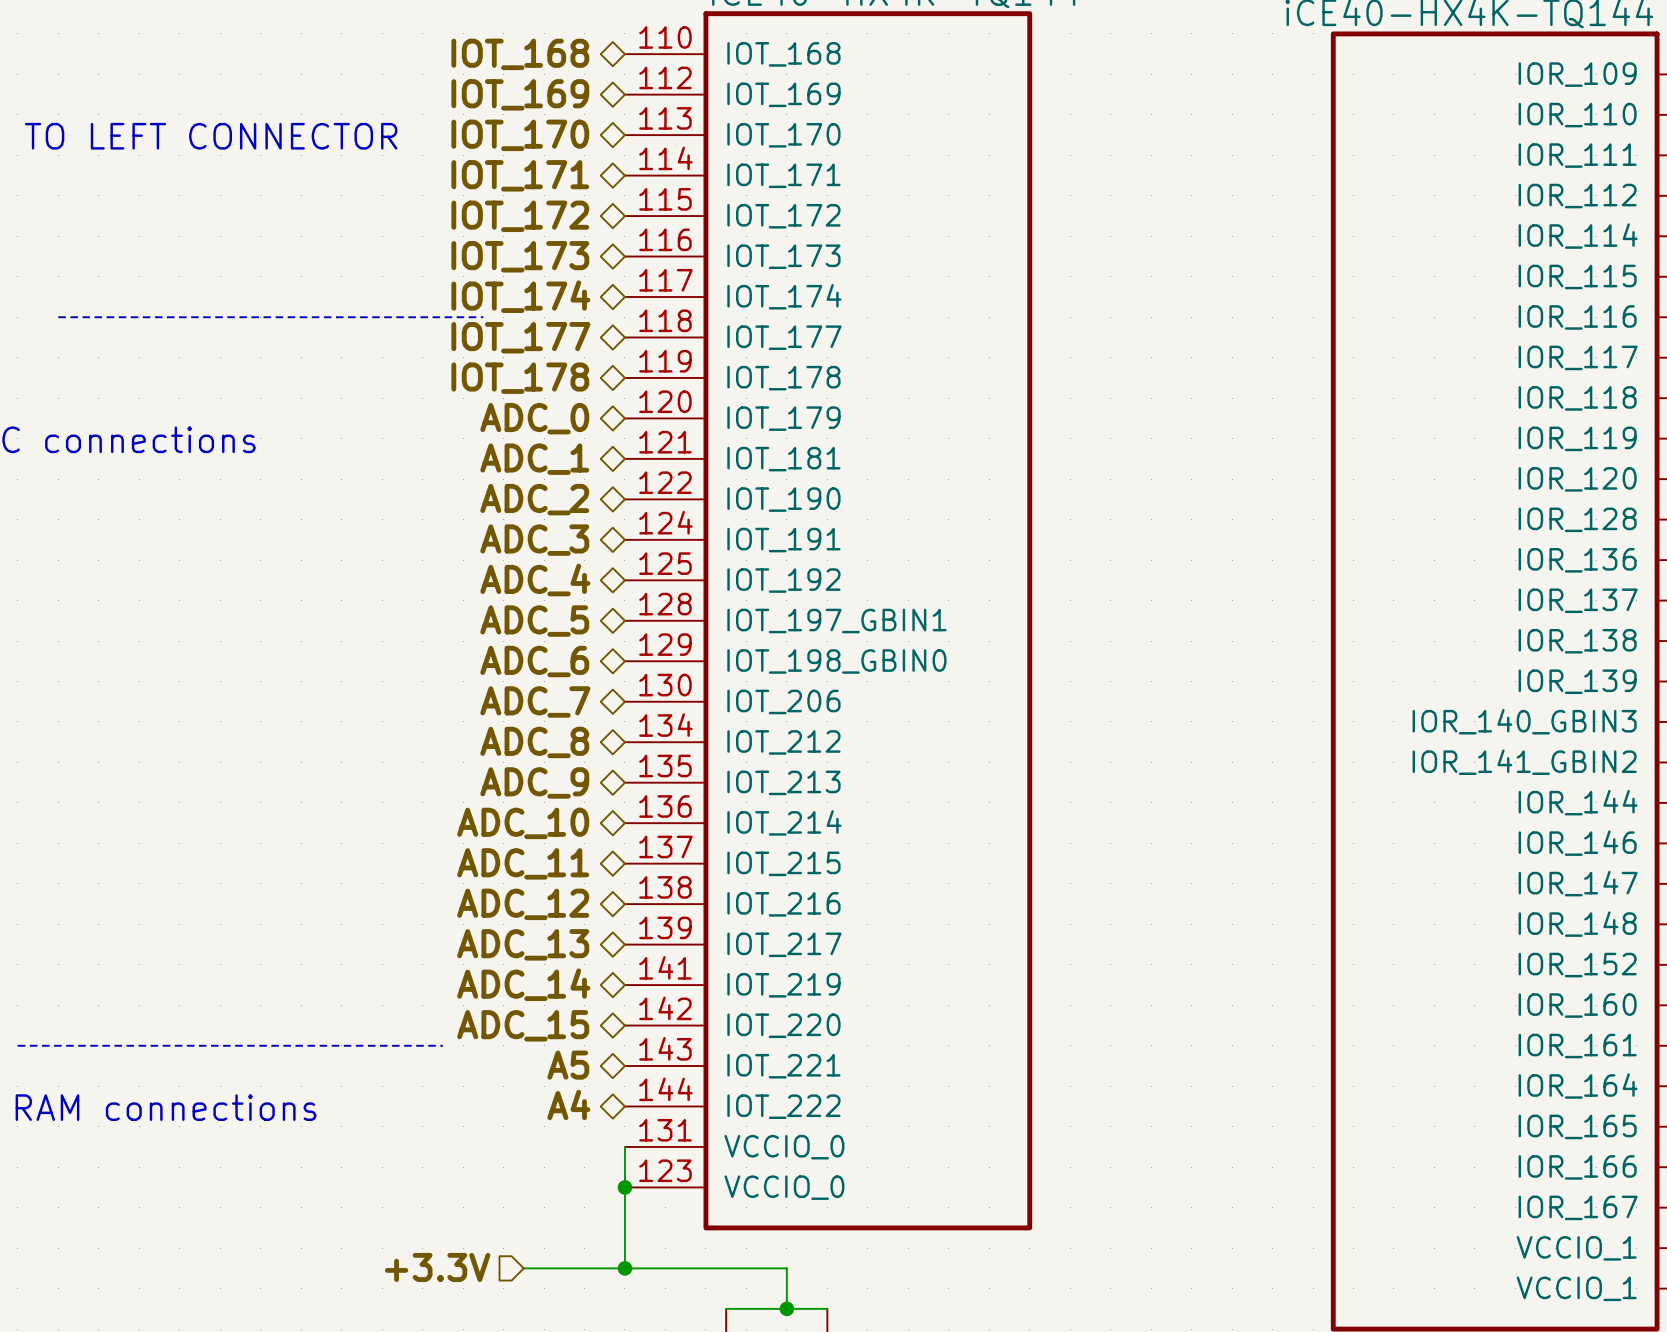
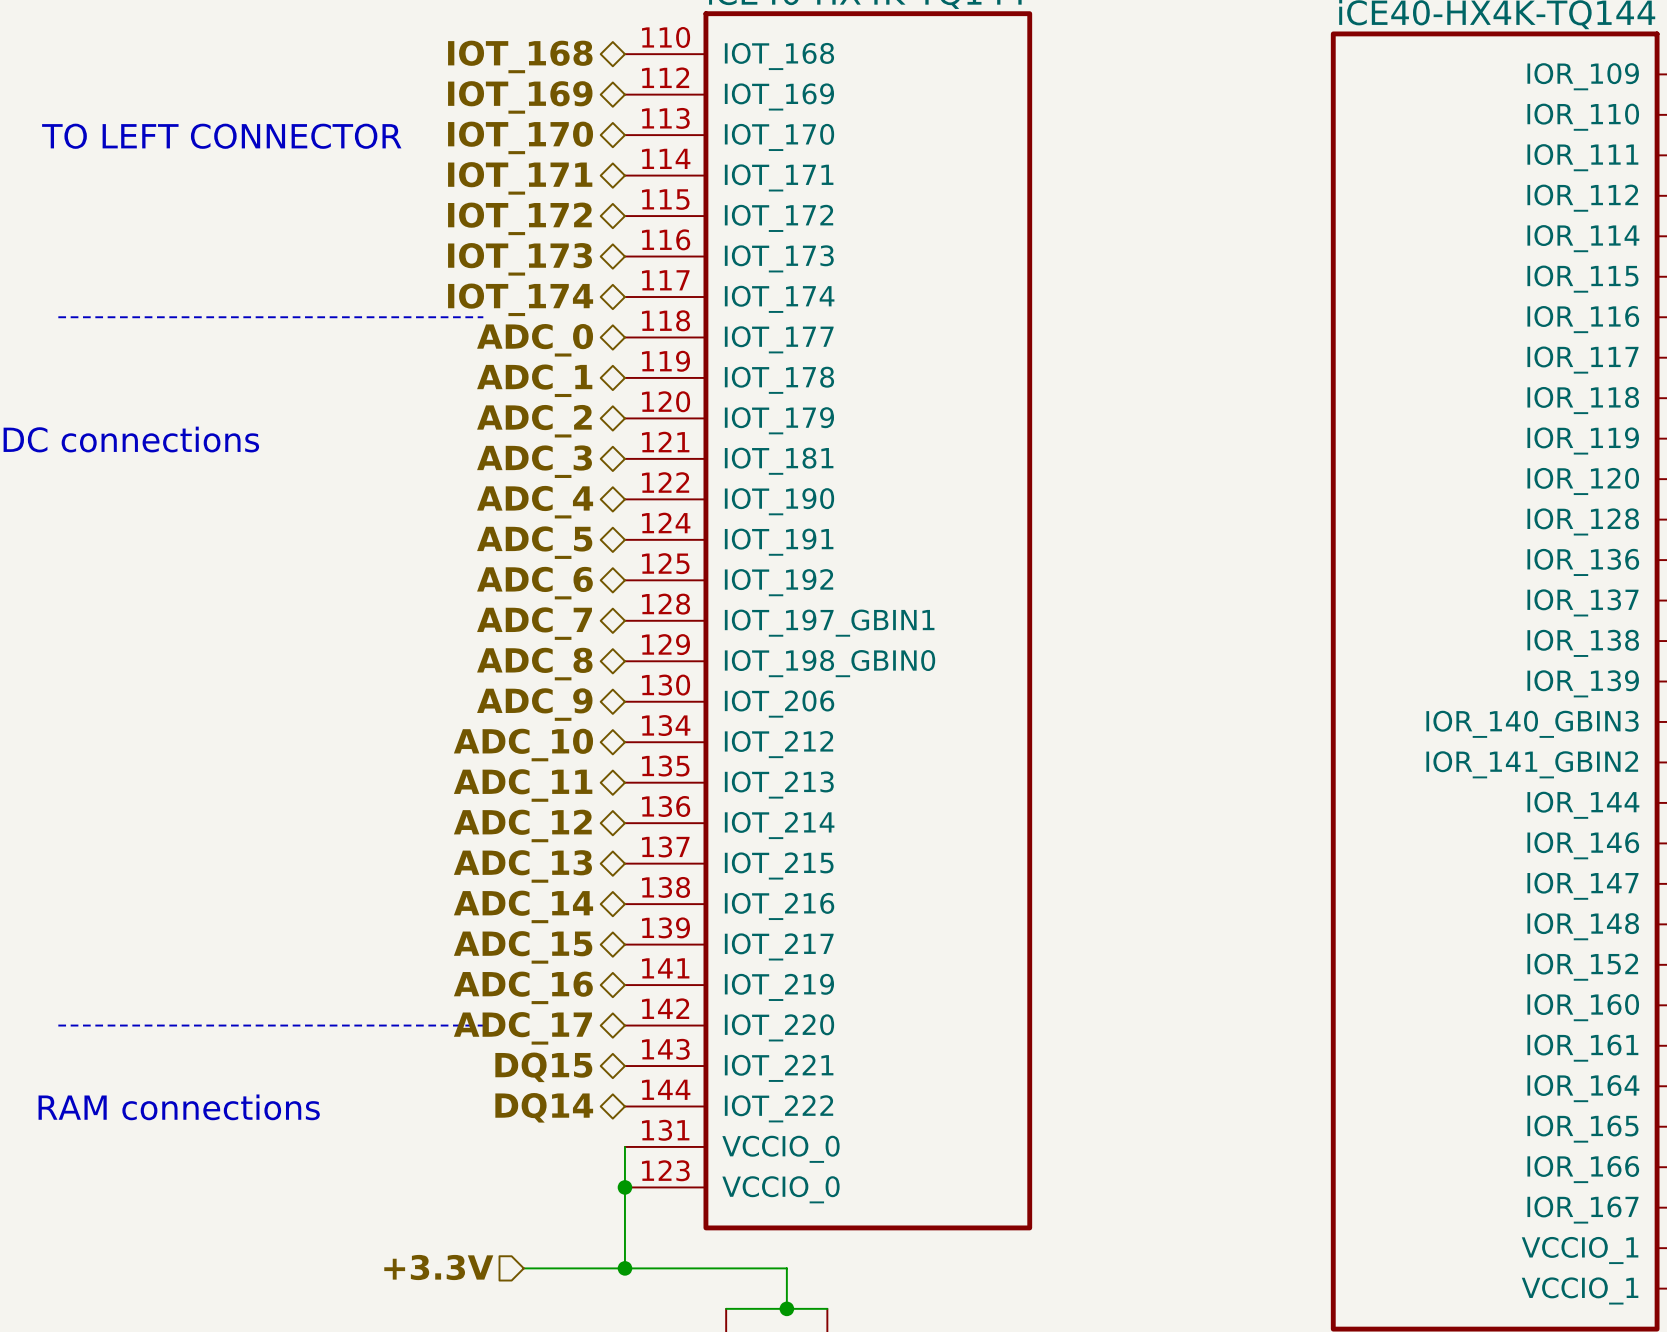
hierarchical label: IOT_177 (520, 337) -> ADC_0 (535, 340)
hierarchical label: IOT_178 (520, 378) -> ADC_1 (534, 380)
hierarchical label: ADC_0 (534, 418) -> ADC_2 (534, 421)
hierarchical label: ADC_1 (534, 459) -> ADC_3 (534, 461)
hierarchical label: ADC_2 (534, 499) -> ADC_4 (535, 502)
hierarchical label: ADC_3 (534, 540) -> ADC_5 (534, 542)
hierarchical label: ADC_4 (535, 579) -> ADC_6 (534, 583)
hierarchical label: ADC_5 (534, 621) -> ADC_7 (534, 623)
hierarchical label: ADC_6 (534, 661) -> ADC_8 (534, 664)
hierarchical label: ADC_7 (535, 701) -> ADC_9 (534, 704)
hierarchical label: ADC_8 (534, 742) -> ADC_10 (523, 745)
hierarchical label: ADC_9 (534, 782) -> ADC_11 (523, 785)
hierarchical label: ADC_10 (523, 823) -> ADC_12 (522, 825)
hierarchical label: ADC_11 (523, 863) -> ADC_13 (522, 866)
hierarchical label: ADC_12 (523, 904) -> ADC_14 (523, 906)
hierarchical label: ADC_13 (523, 944) -> ADC_15 (523, 947)
hierarchical label: ADC_14 (523, 984) -> ADC_16 (523, 987)
hierarchical label: ADC_15 (523, 1025) -> ADC_17 (522, 1028)
line: (17, 1045) (442, 1045) -> (58, 1025) (483, 1025)
hierarchical label: A5 (568, 1065) -> DQ15 (543, 1067)
hierarchical label: A4 (568, 1105) -> DQ14 (544, 1107)

